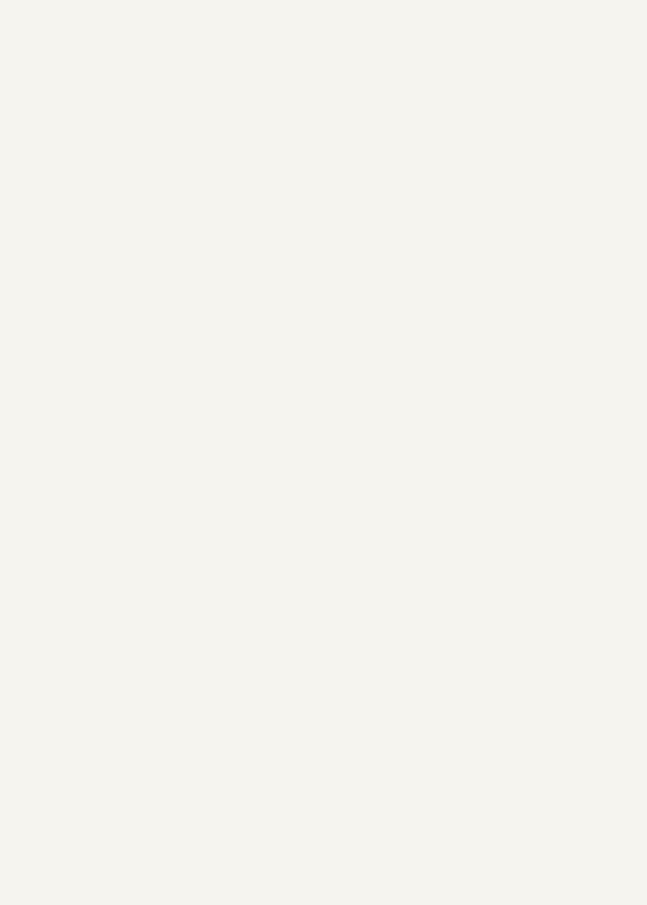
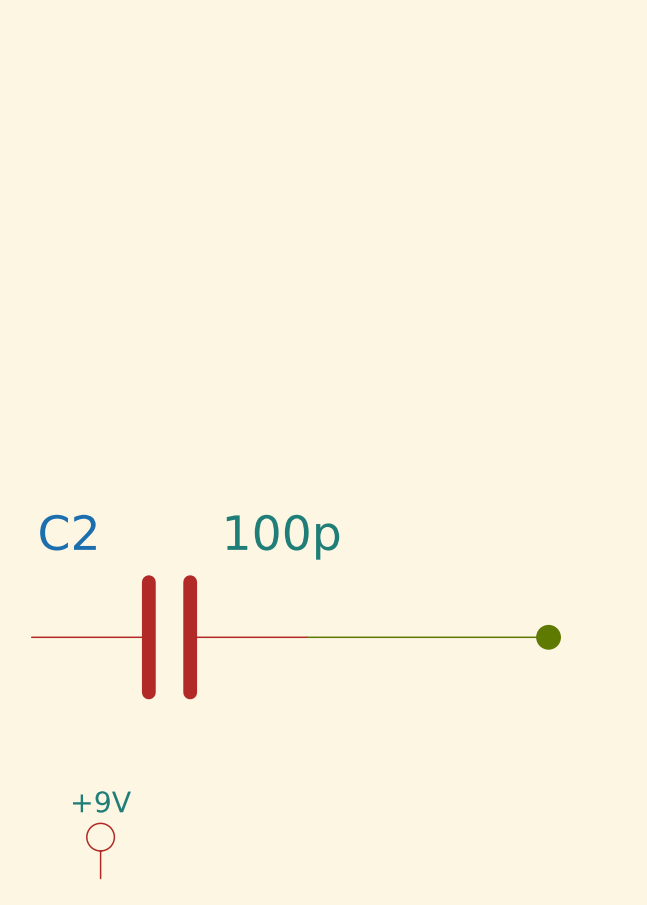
C2: none -> 100p (169, 637)
wire: none -> (307, 637) (548, 637)
junction: none -> (548, 637)
power symbol: none -> +9V (100, 850)

